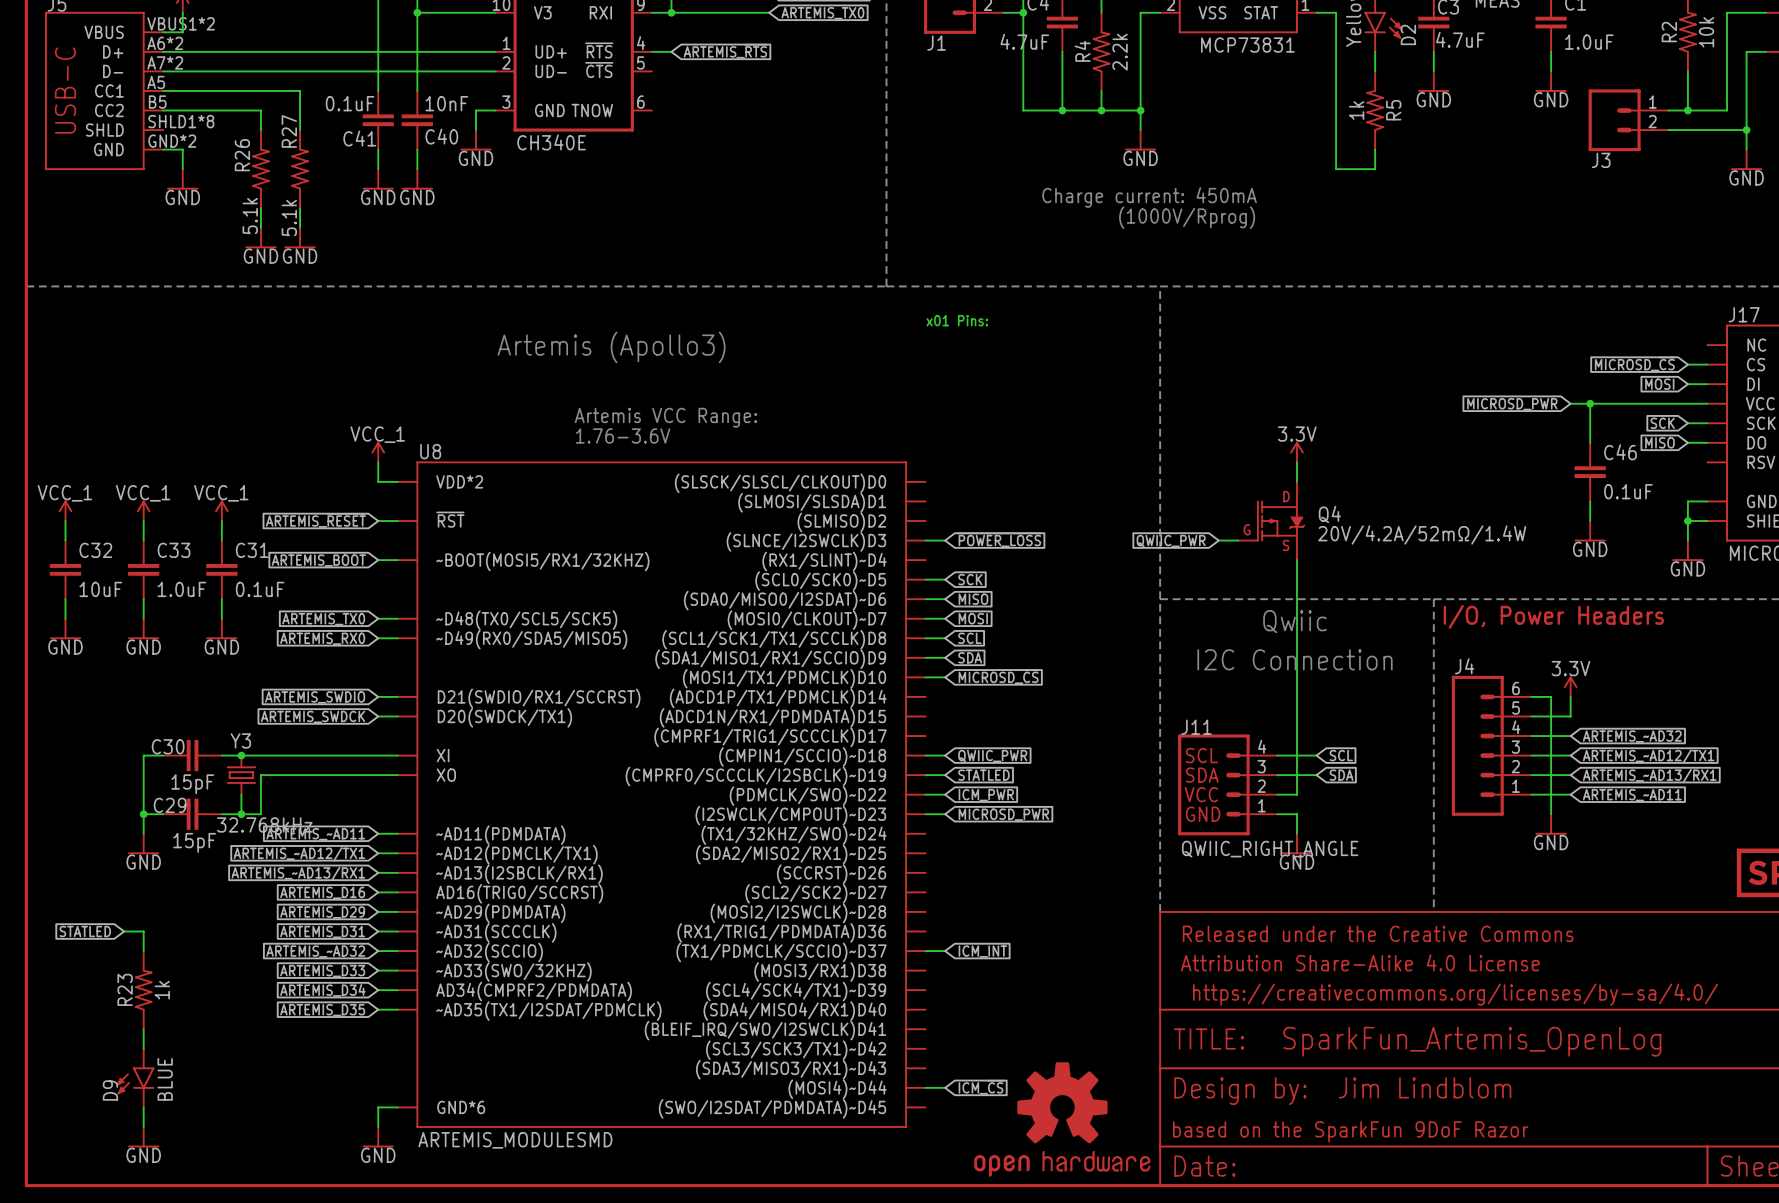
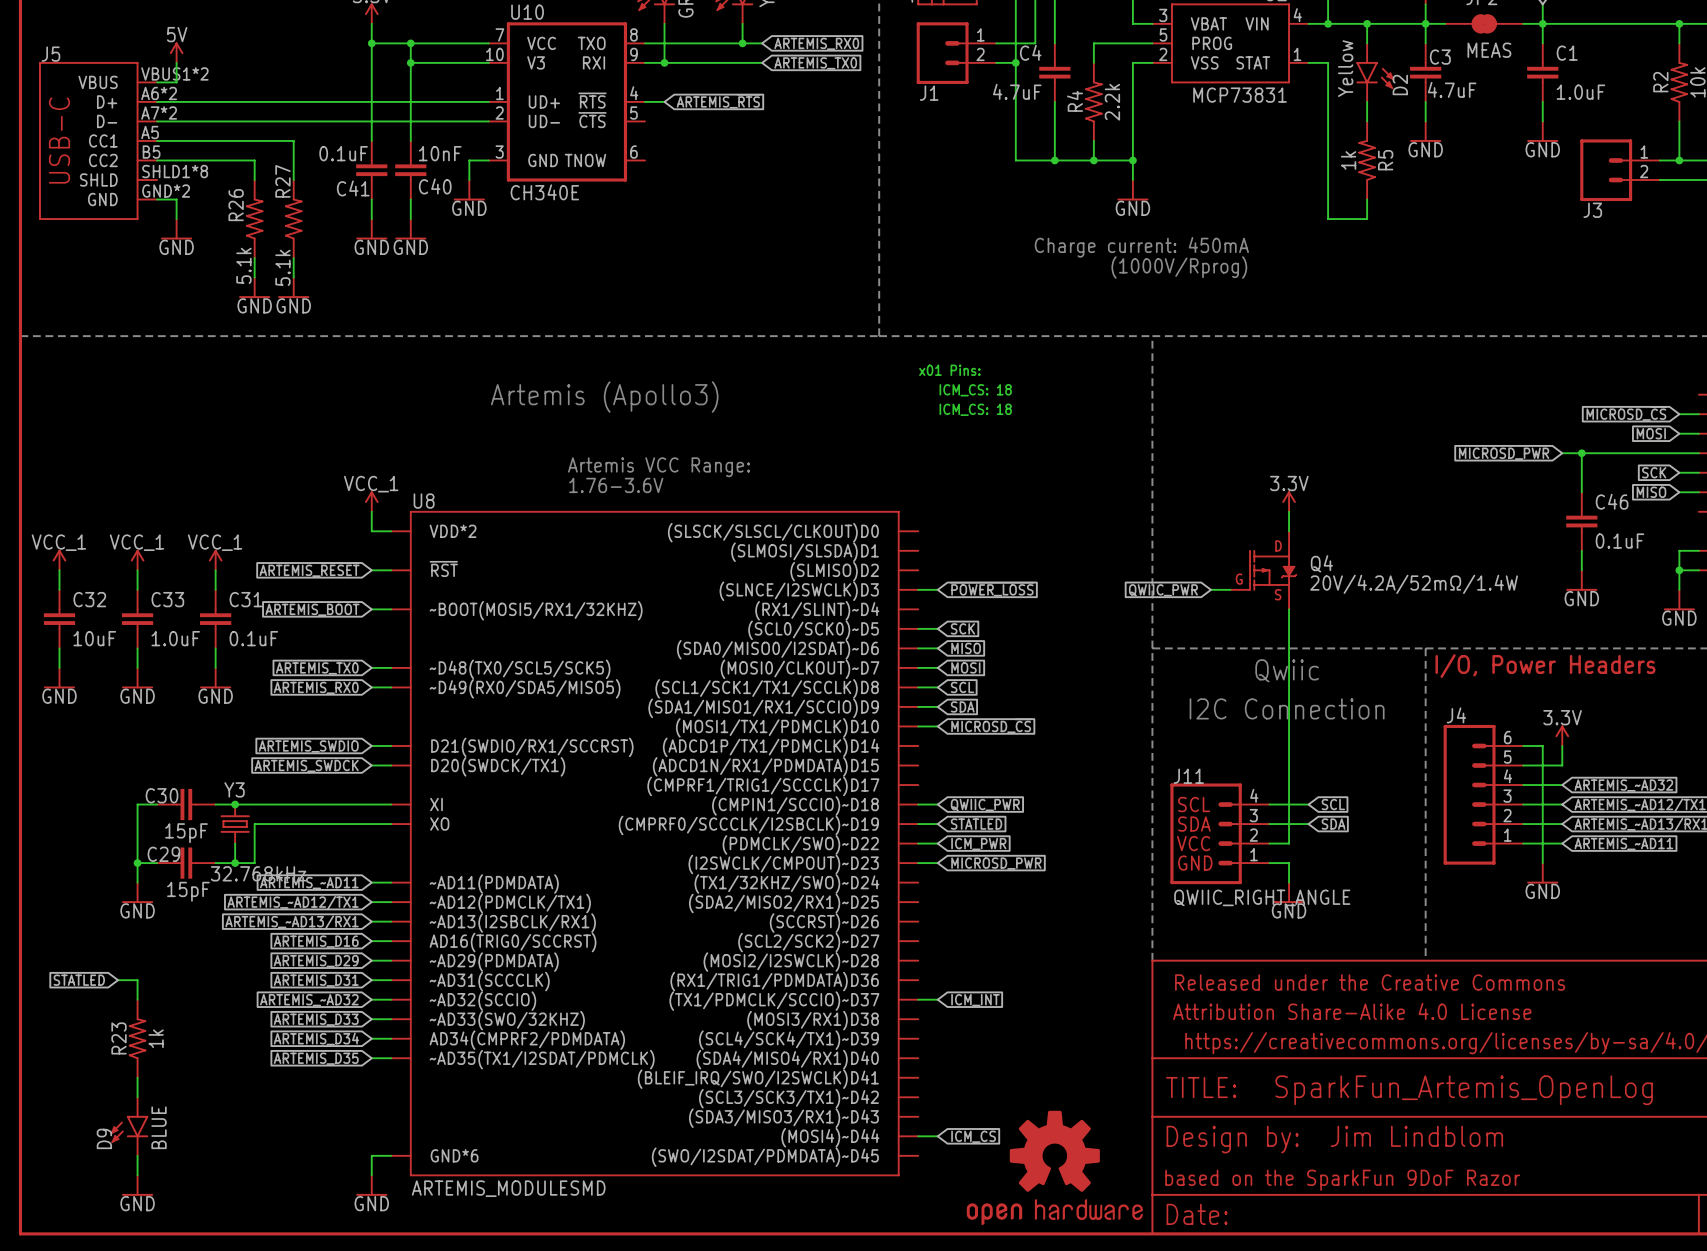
text: none -> ICM_CS: 18 (975, 390)
text: none -> ICM_CS: 18 (975, 409)

